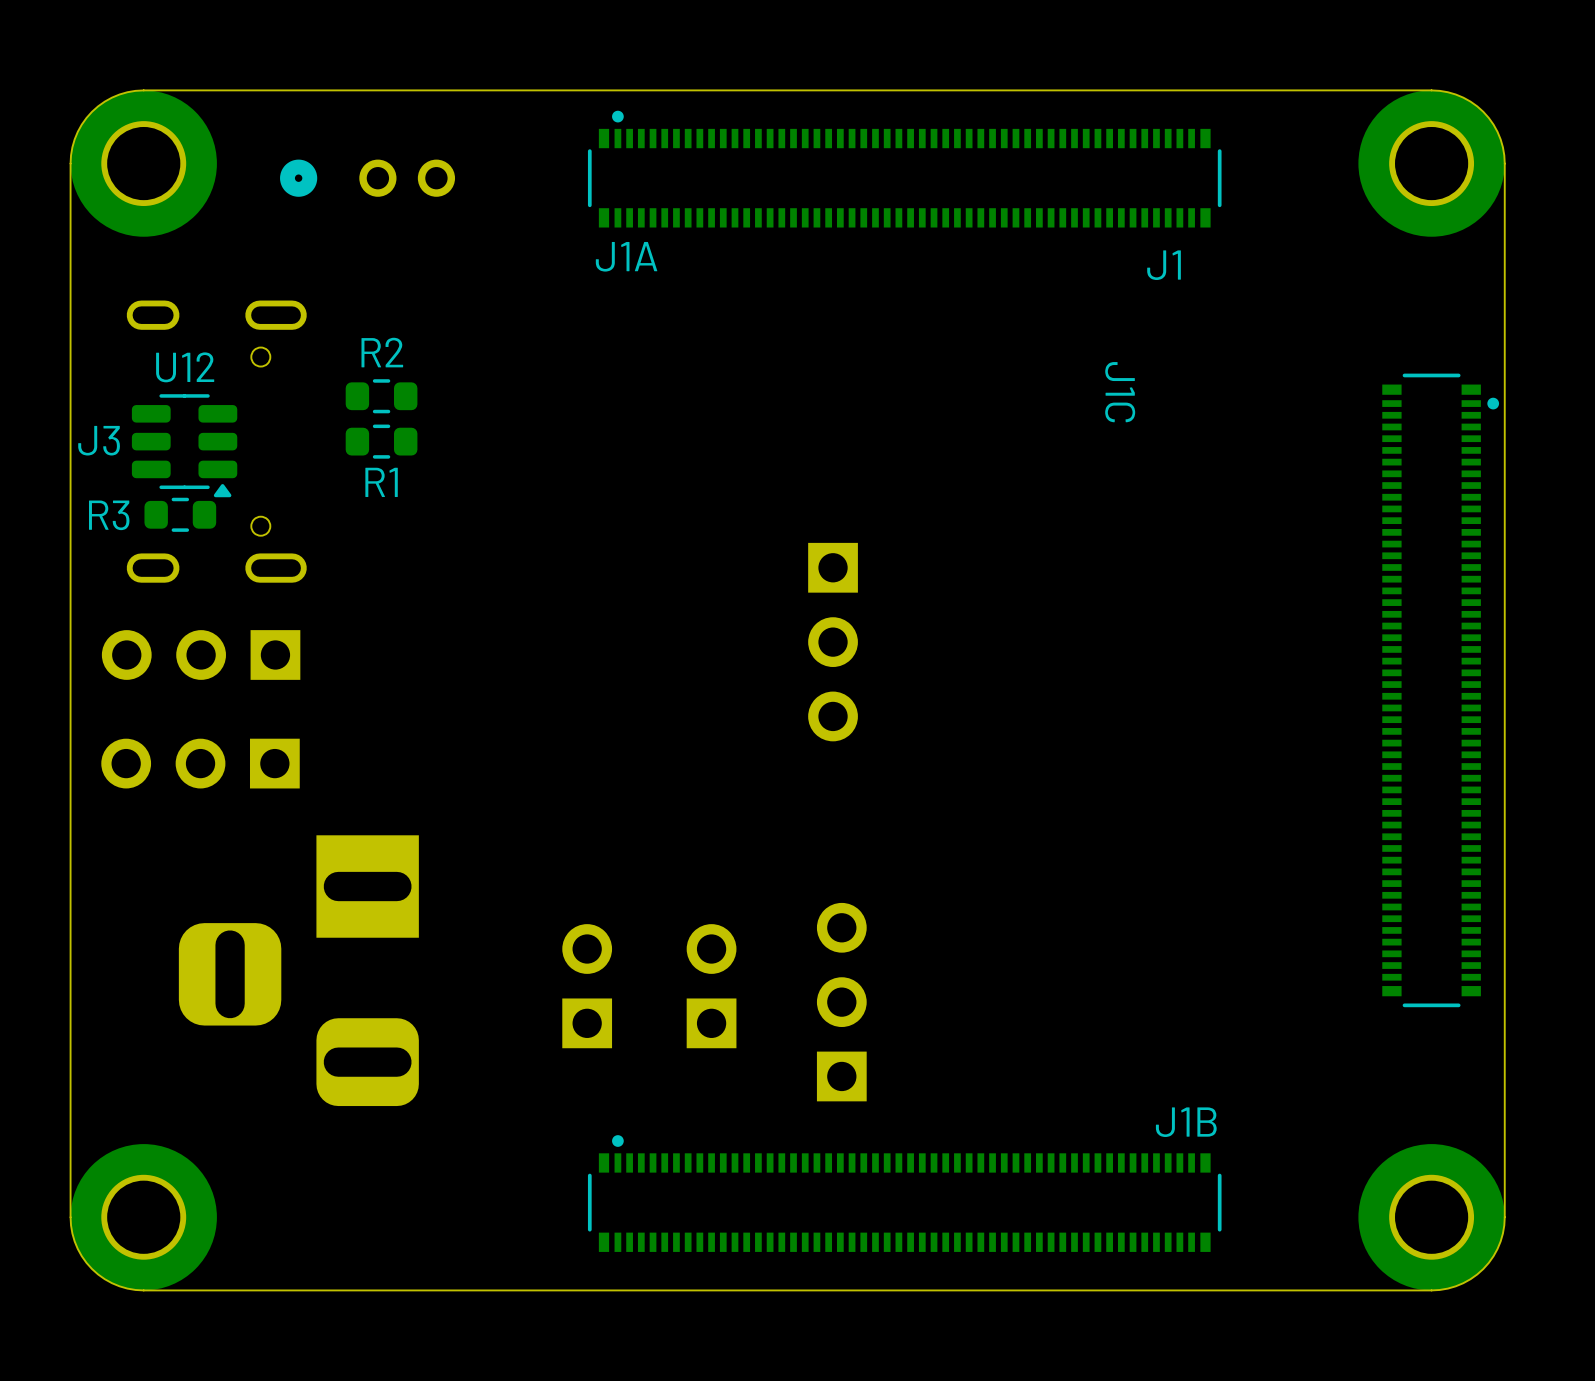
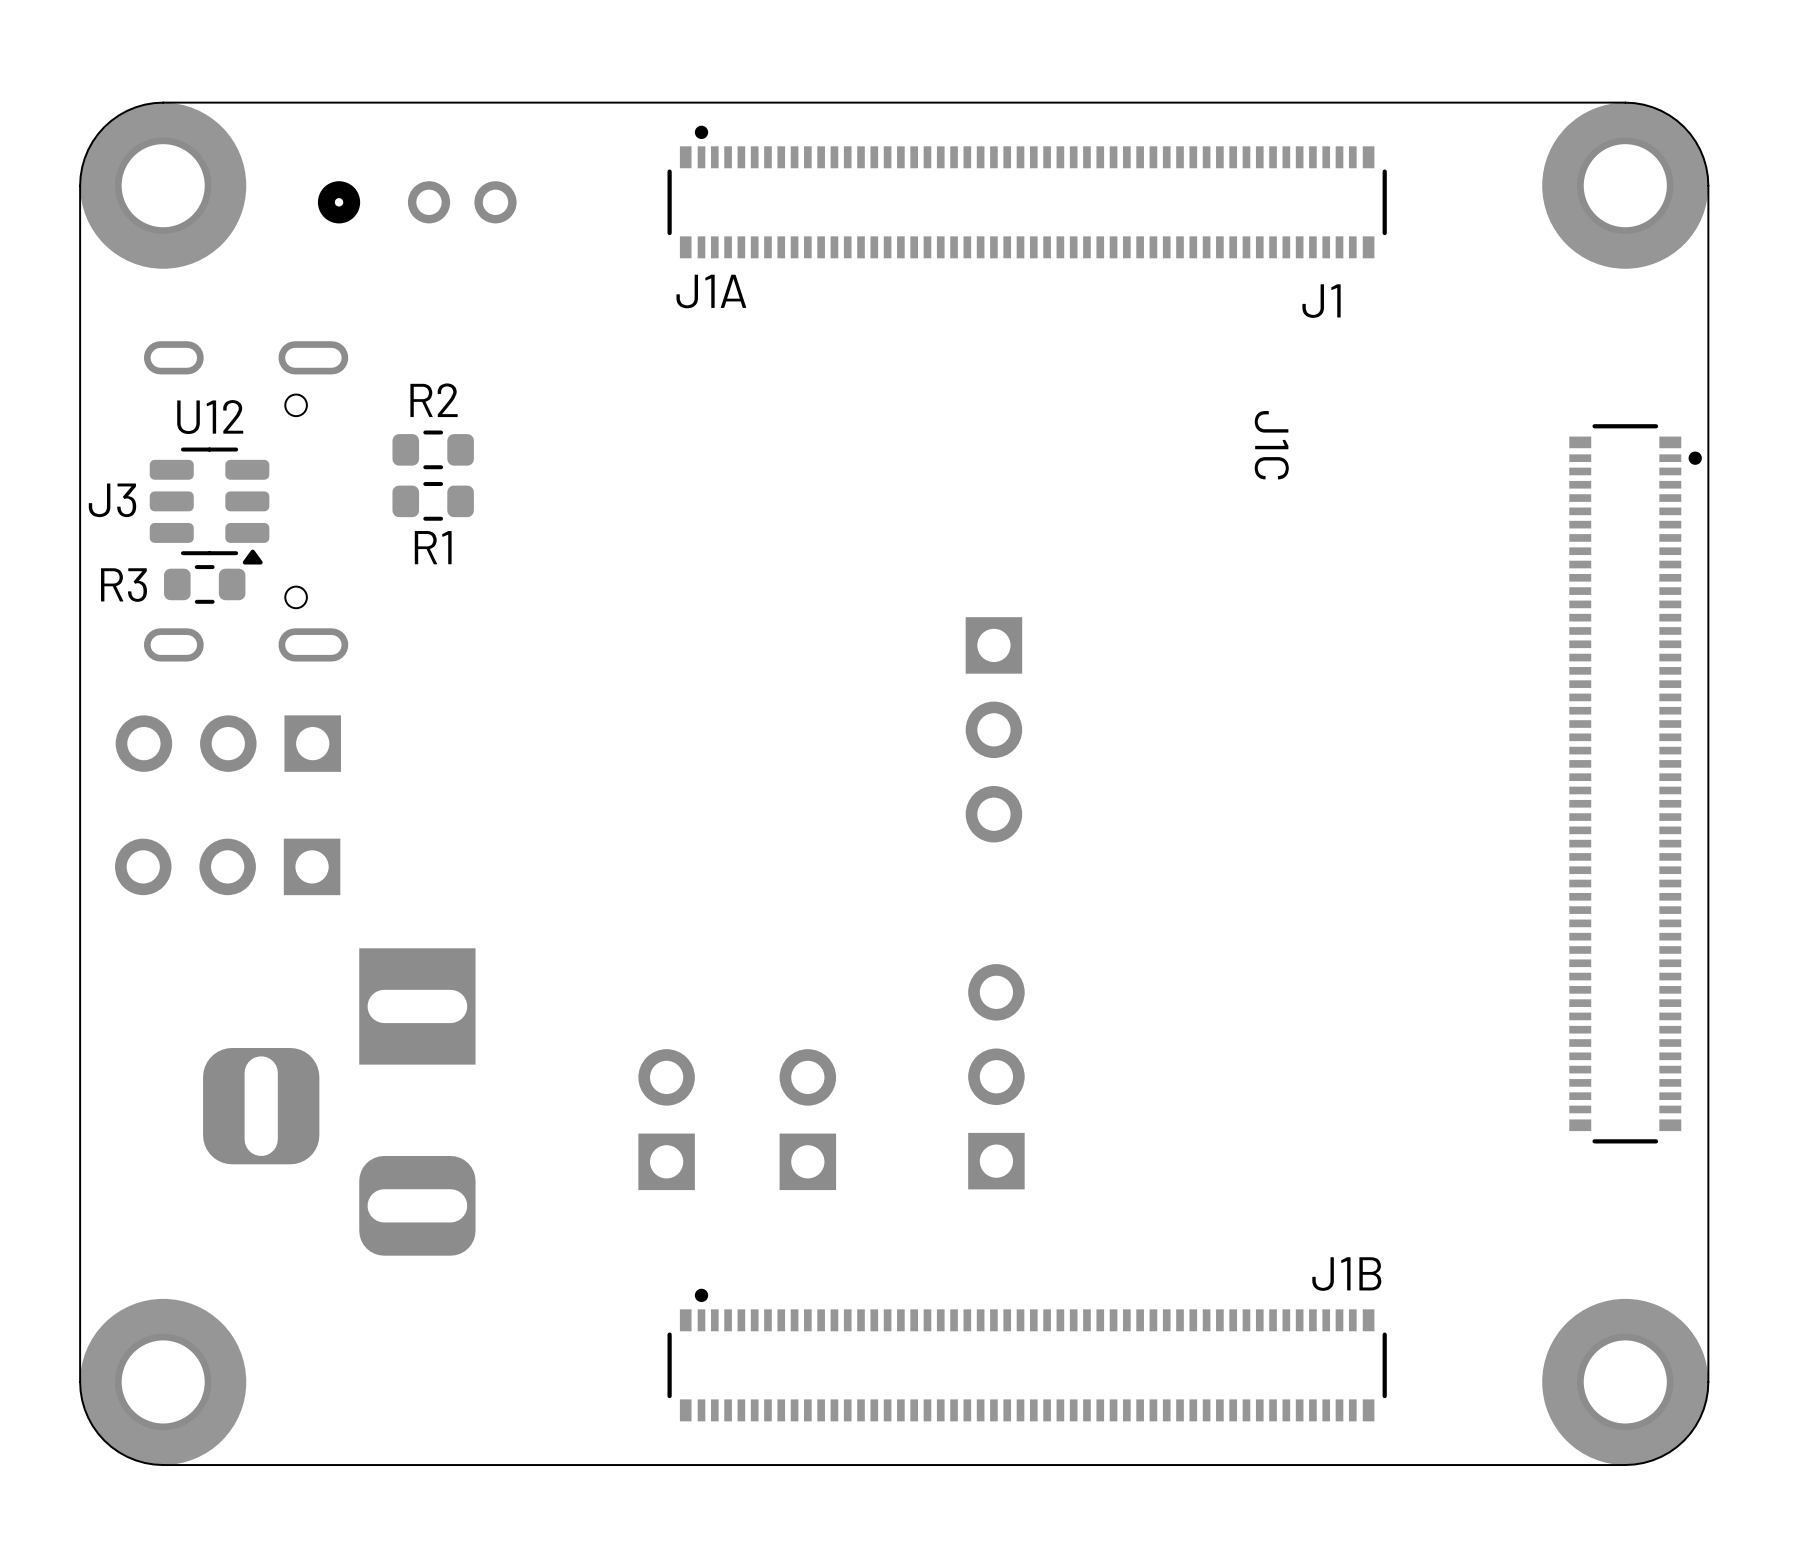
part position: (833, 642) -> (993, 729)
part position: (841, 1002) -> (996, 1076)

